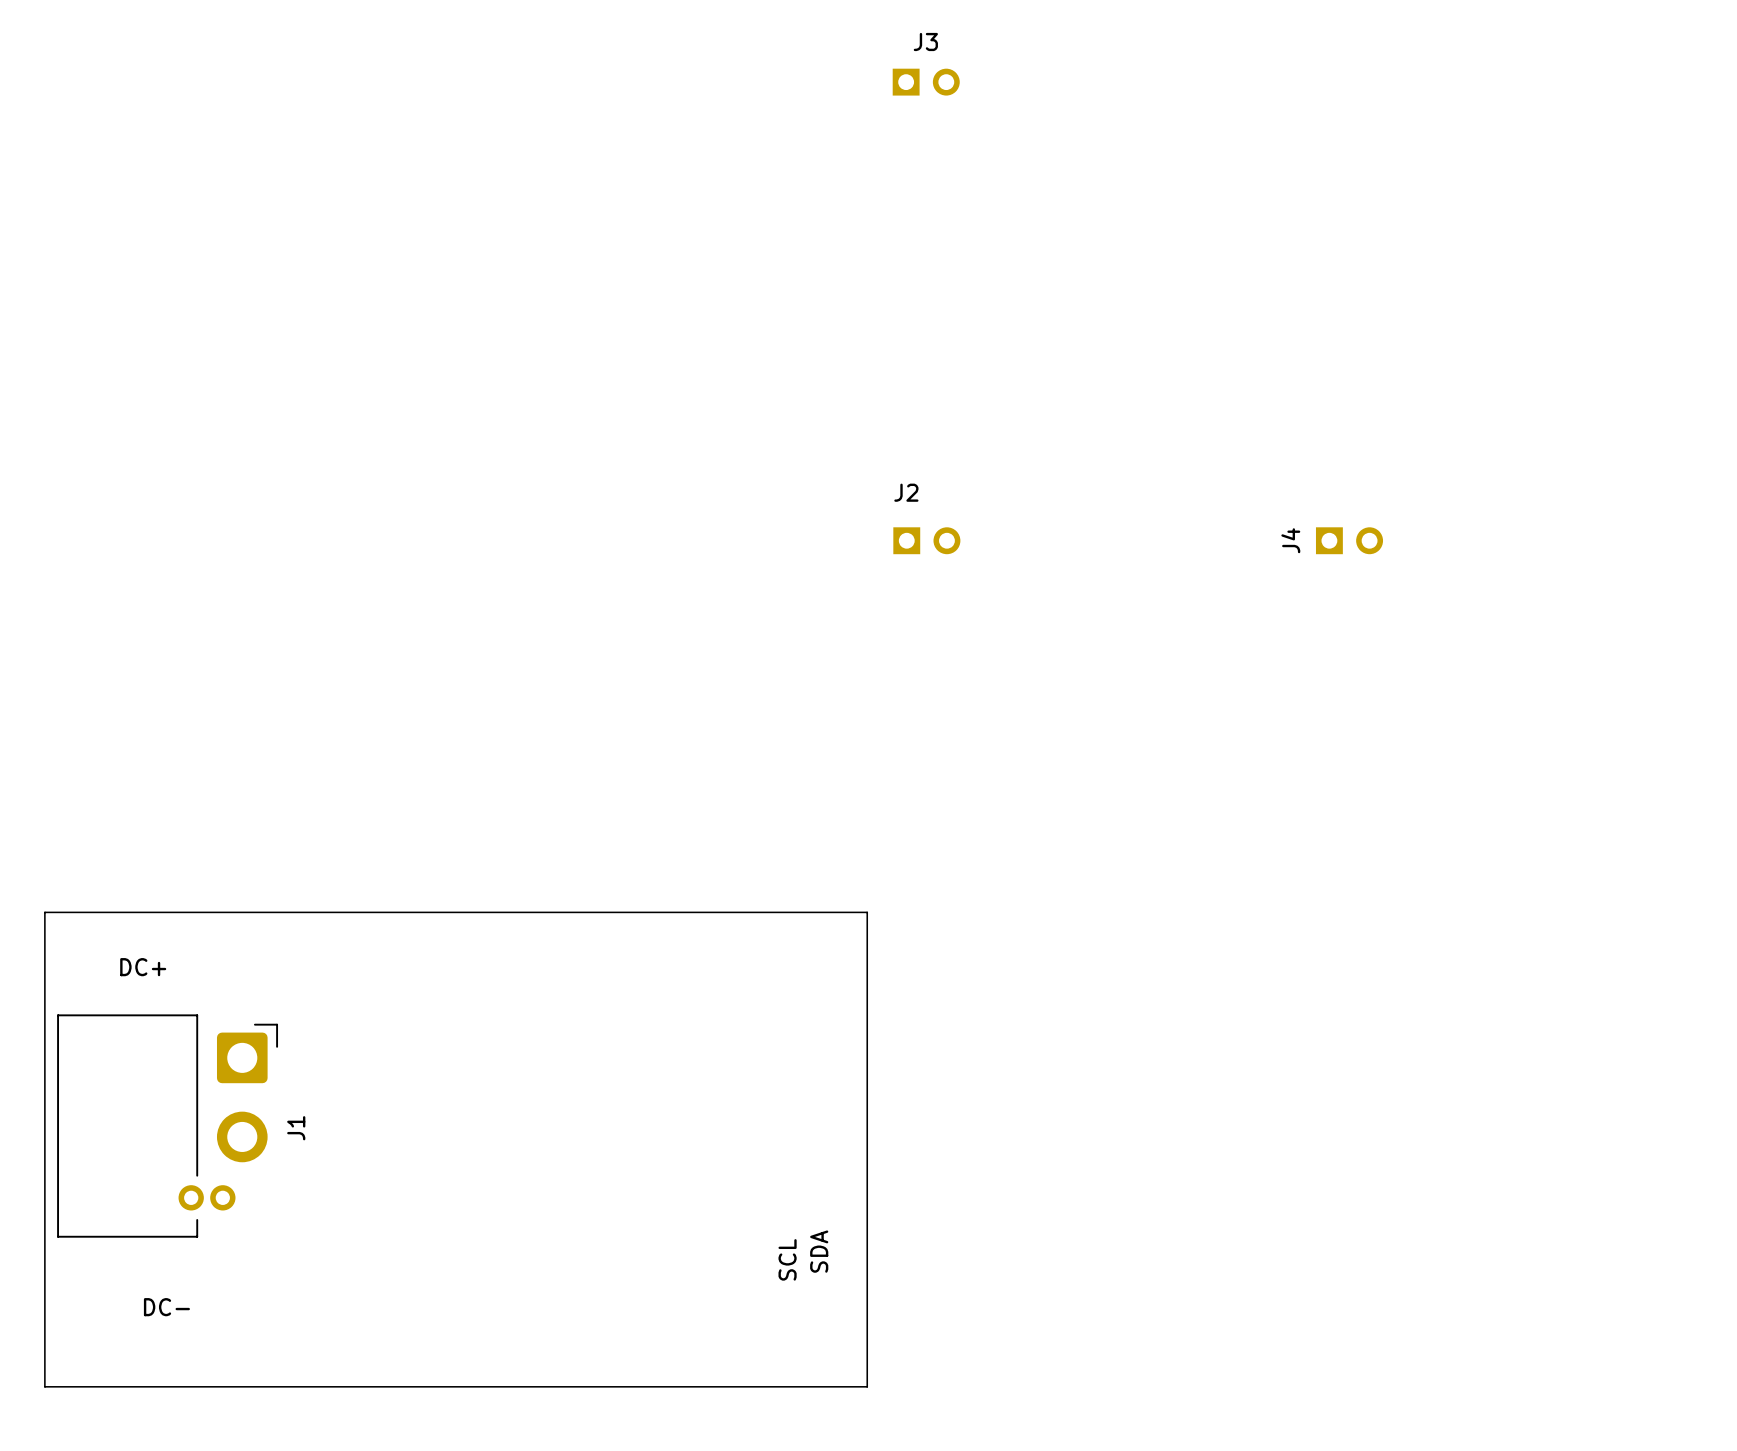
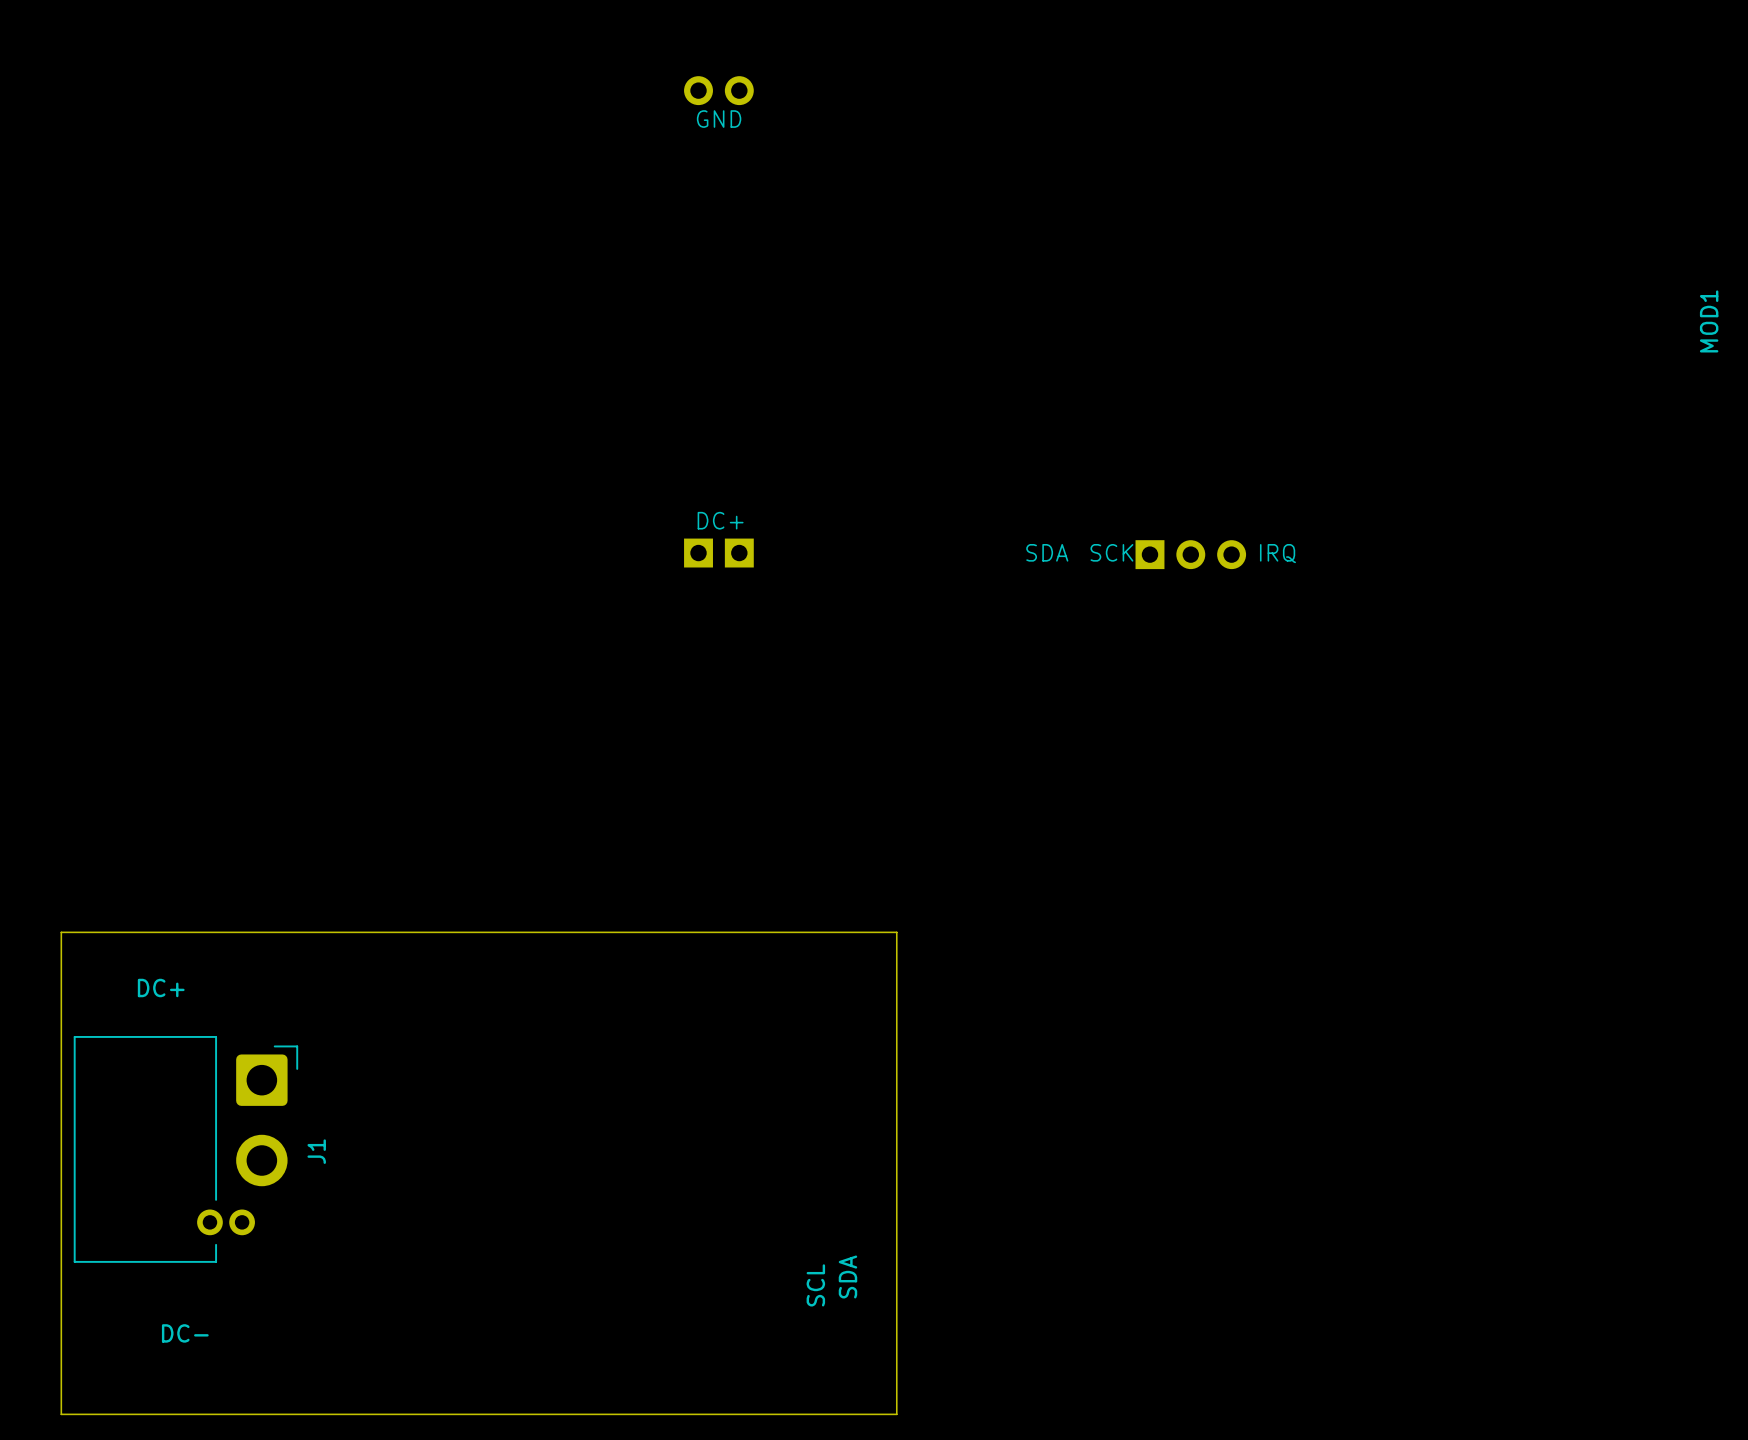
J3: (926, 82) -> none
MOD1: none -> (965, 322)
J2: (926, 540) -> none
J4: (1349, 540) -> none

